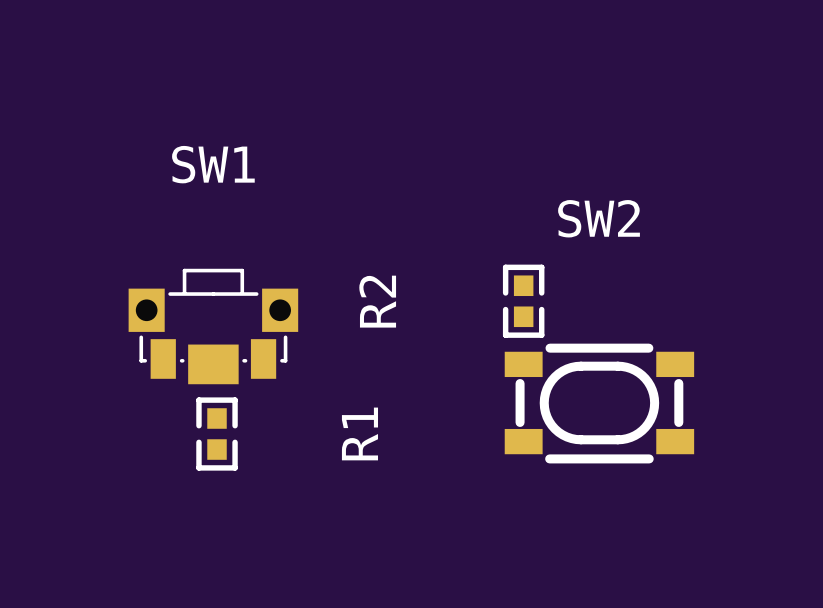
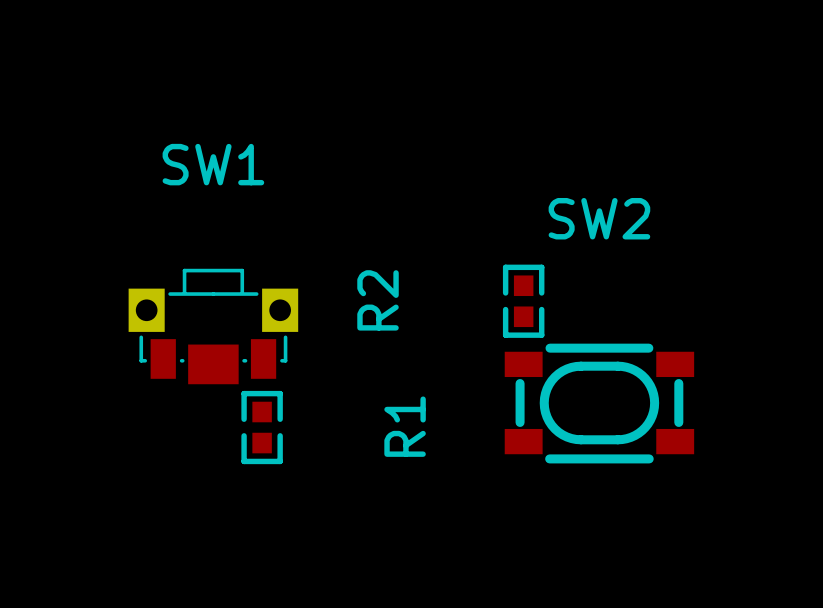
R1 position: (217, 434) -> (262, 427)

